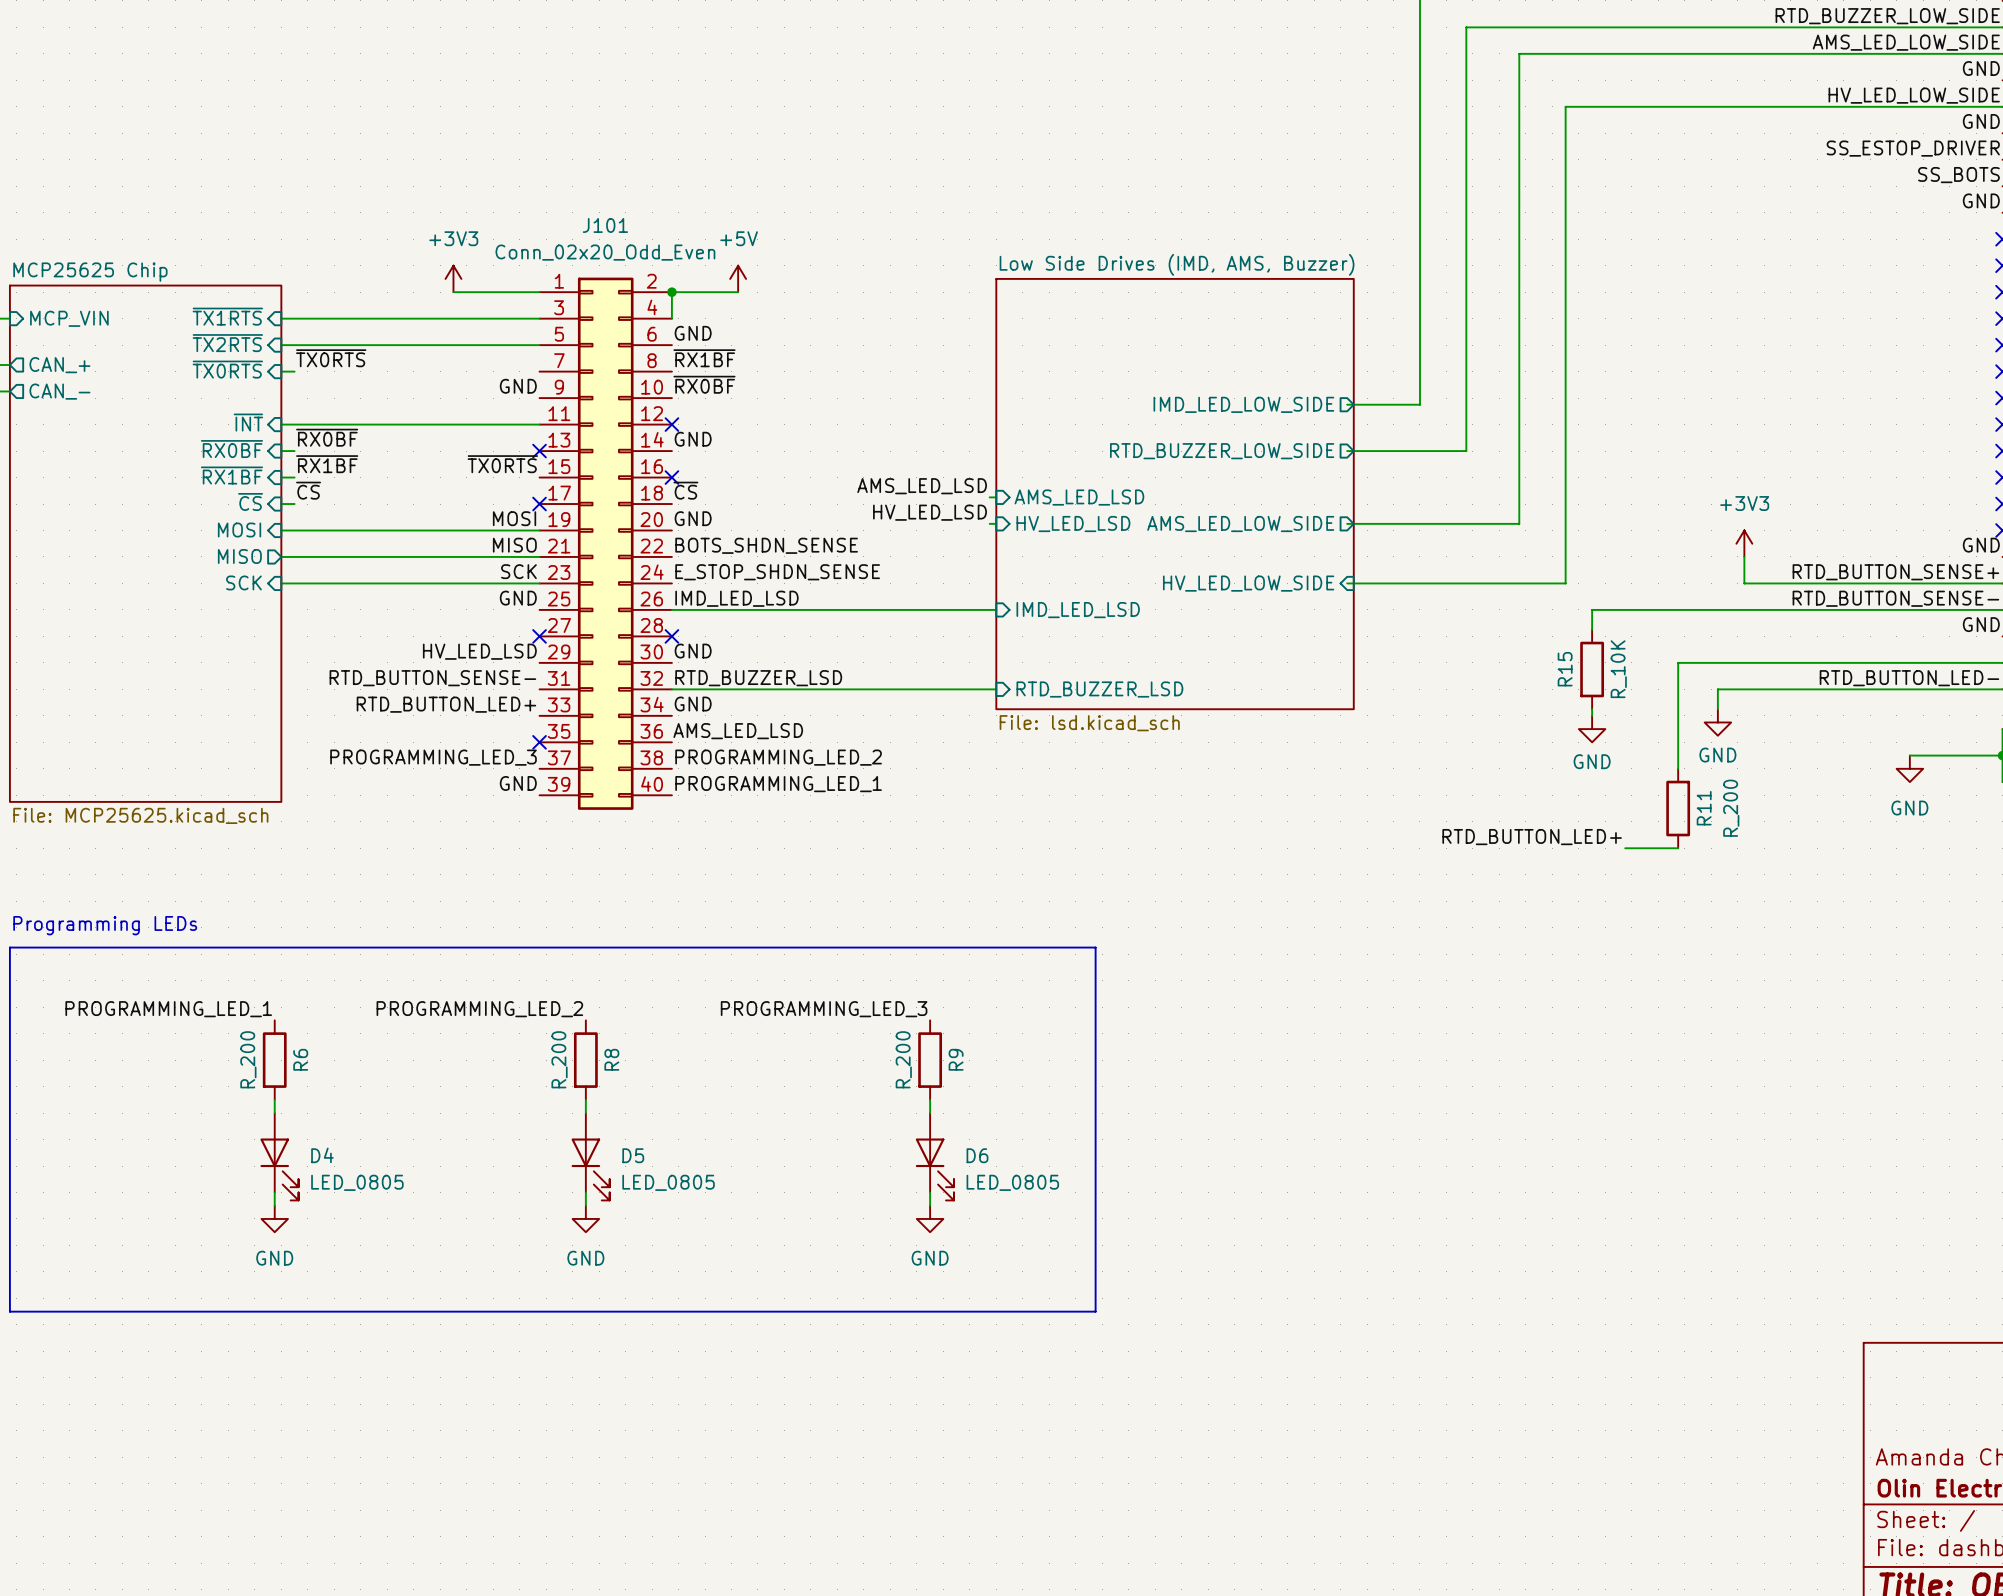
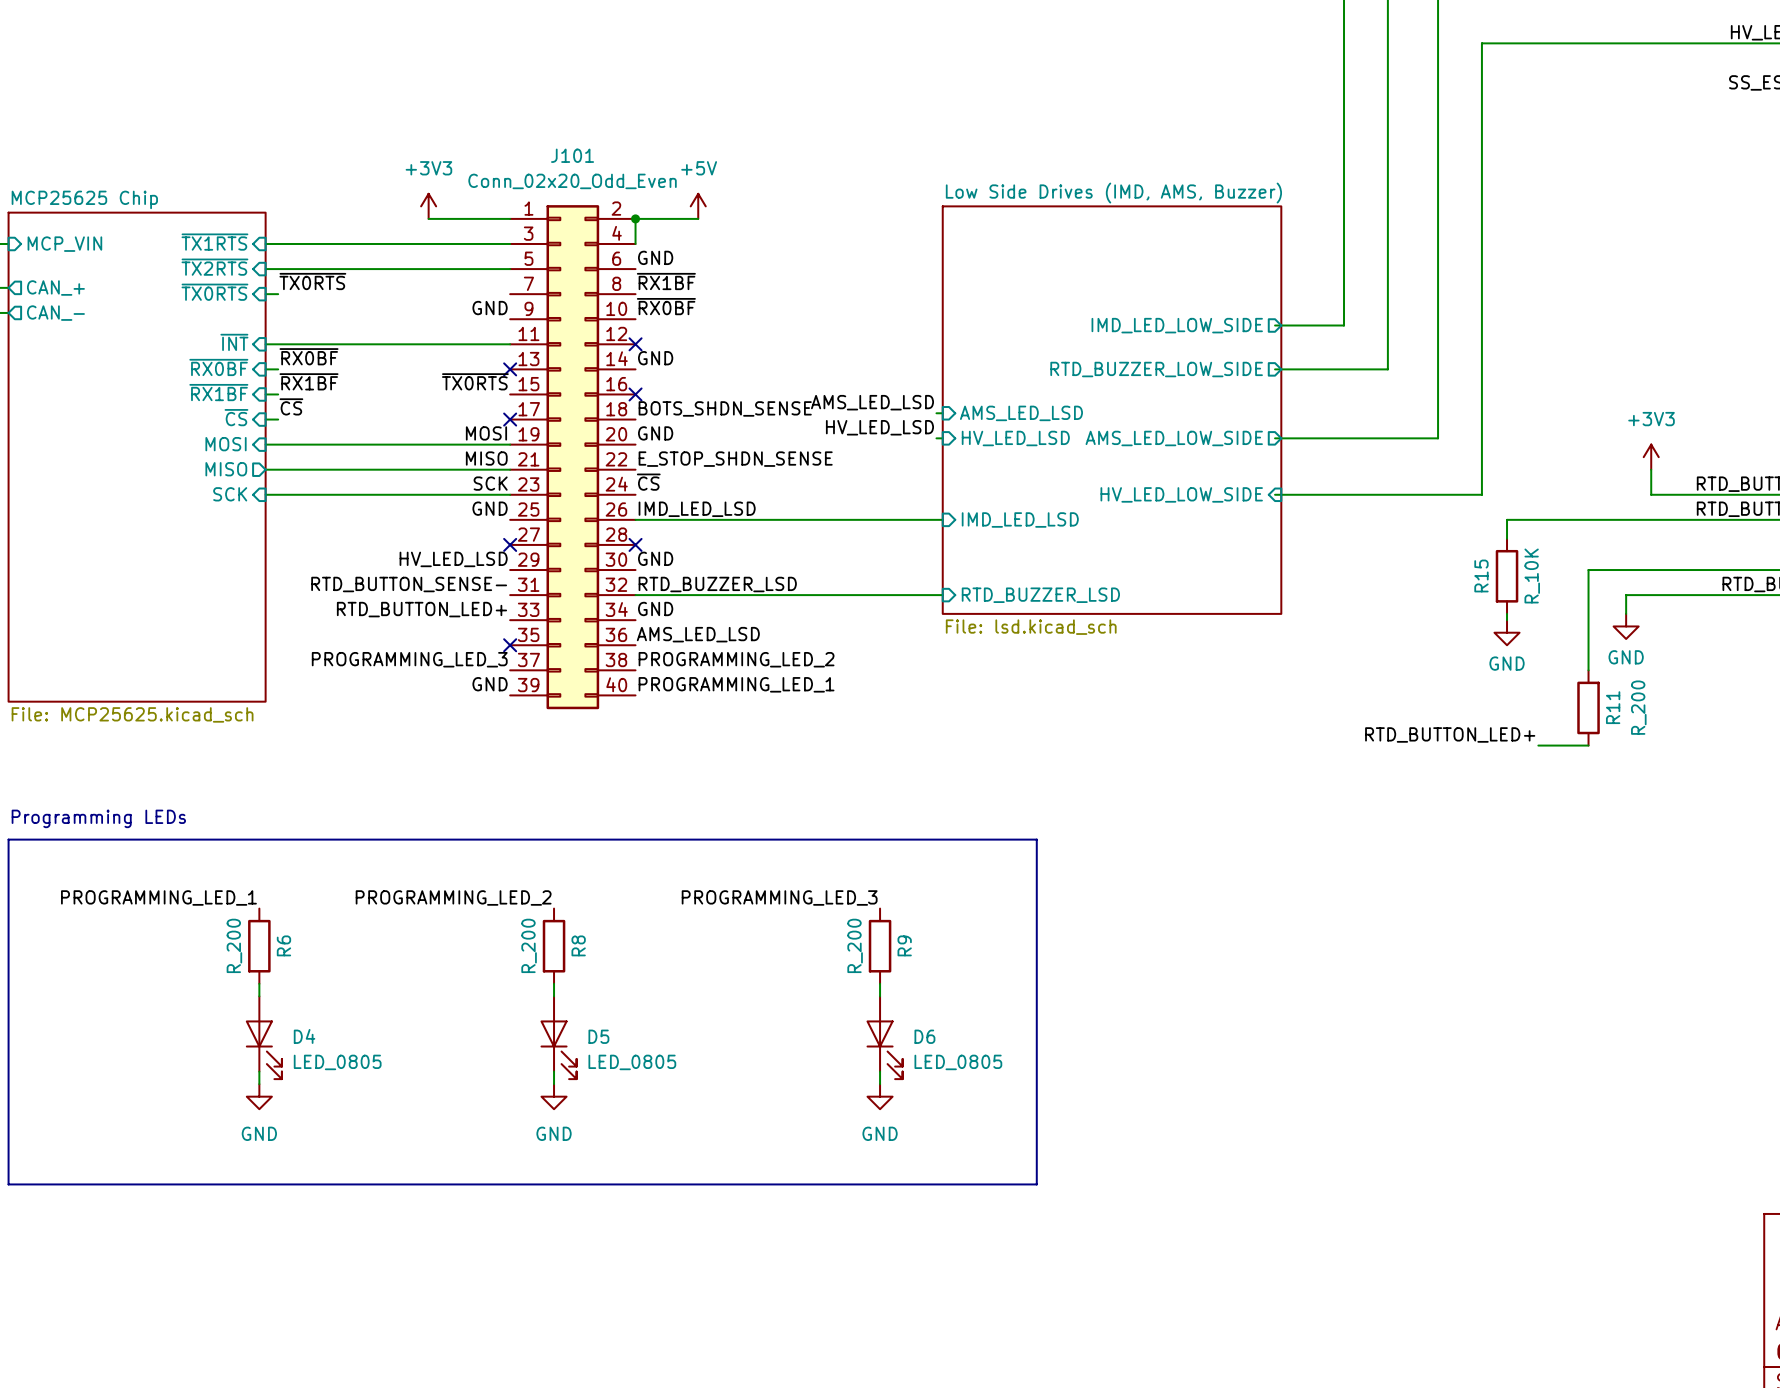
label: ~{CS} (685, 490) -> BOTS_SHDN_SENSE (725, 408)
label: BOTS_SHDN_SENSE (766, 545) -> E_STOP_SHDN_SENSE (735, 459)
label: E_STOP_SHDN_SENSE (777, 572) -> ~{CS} (648, 482)

